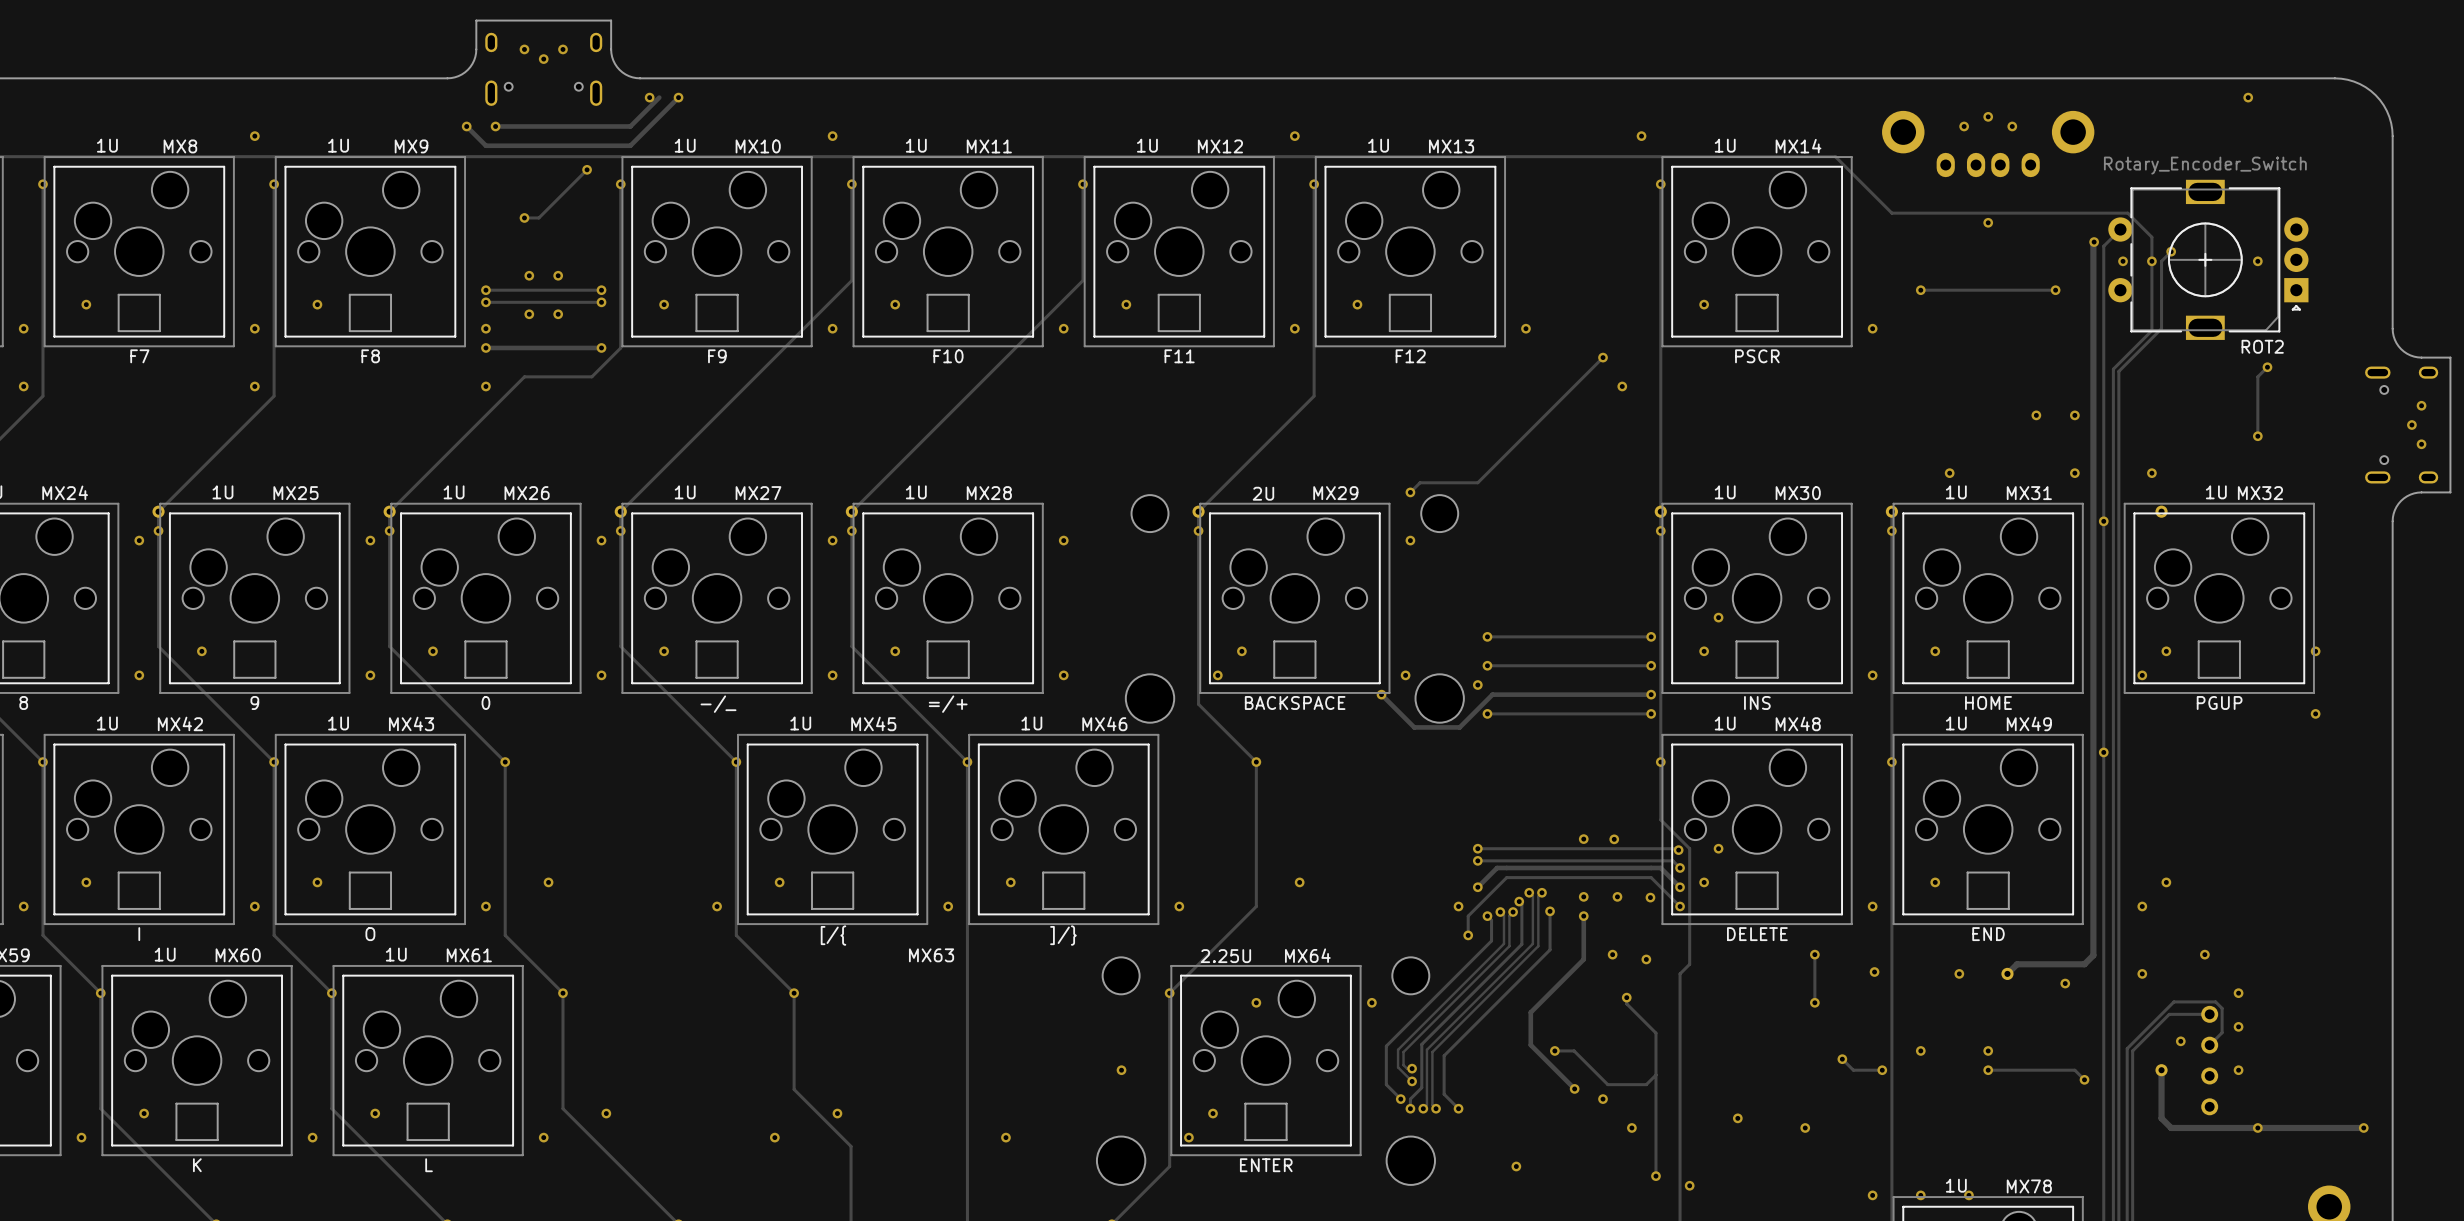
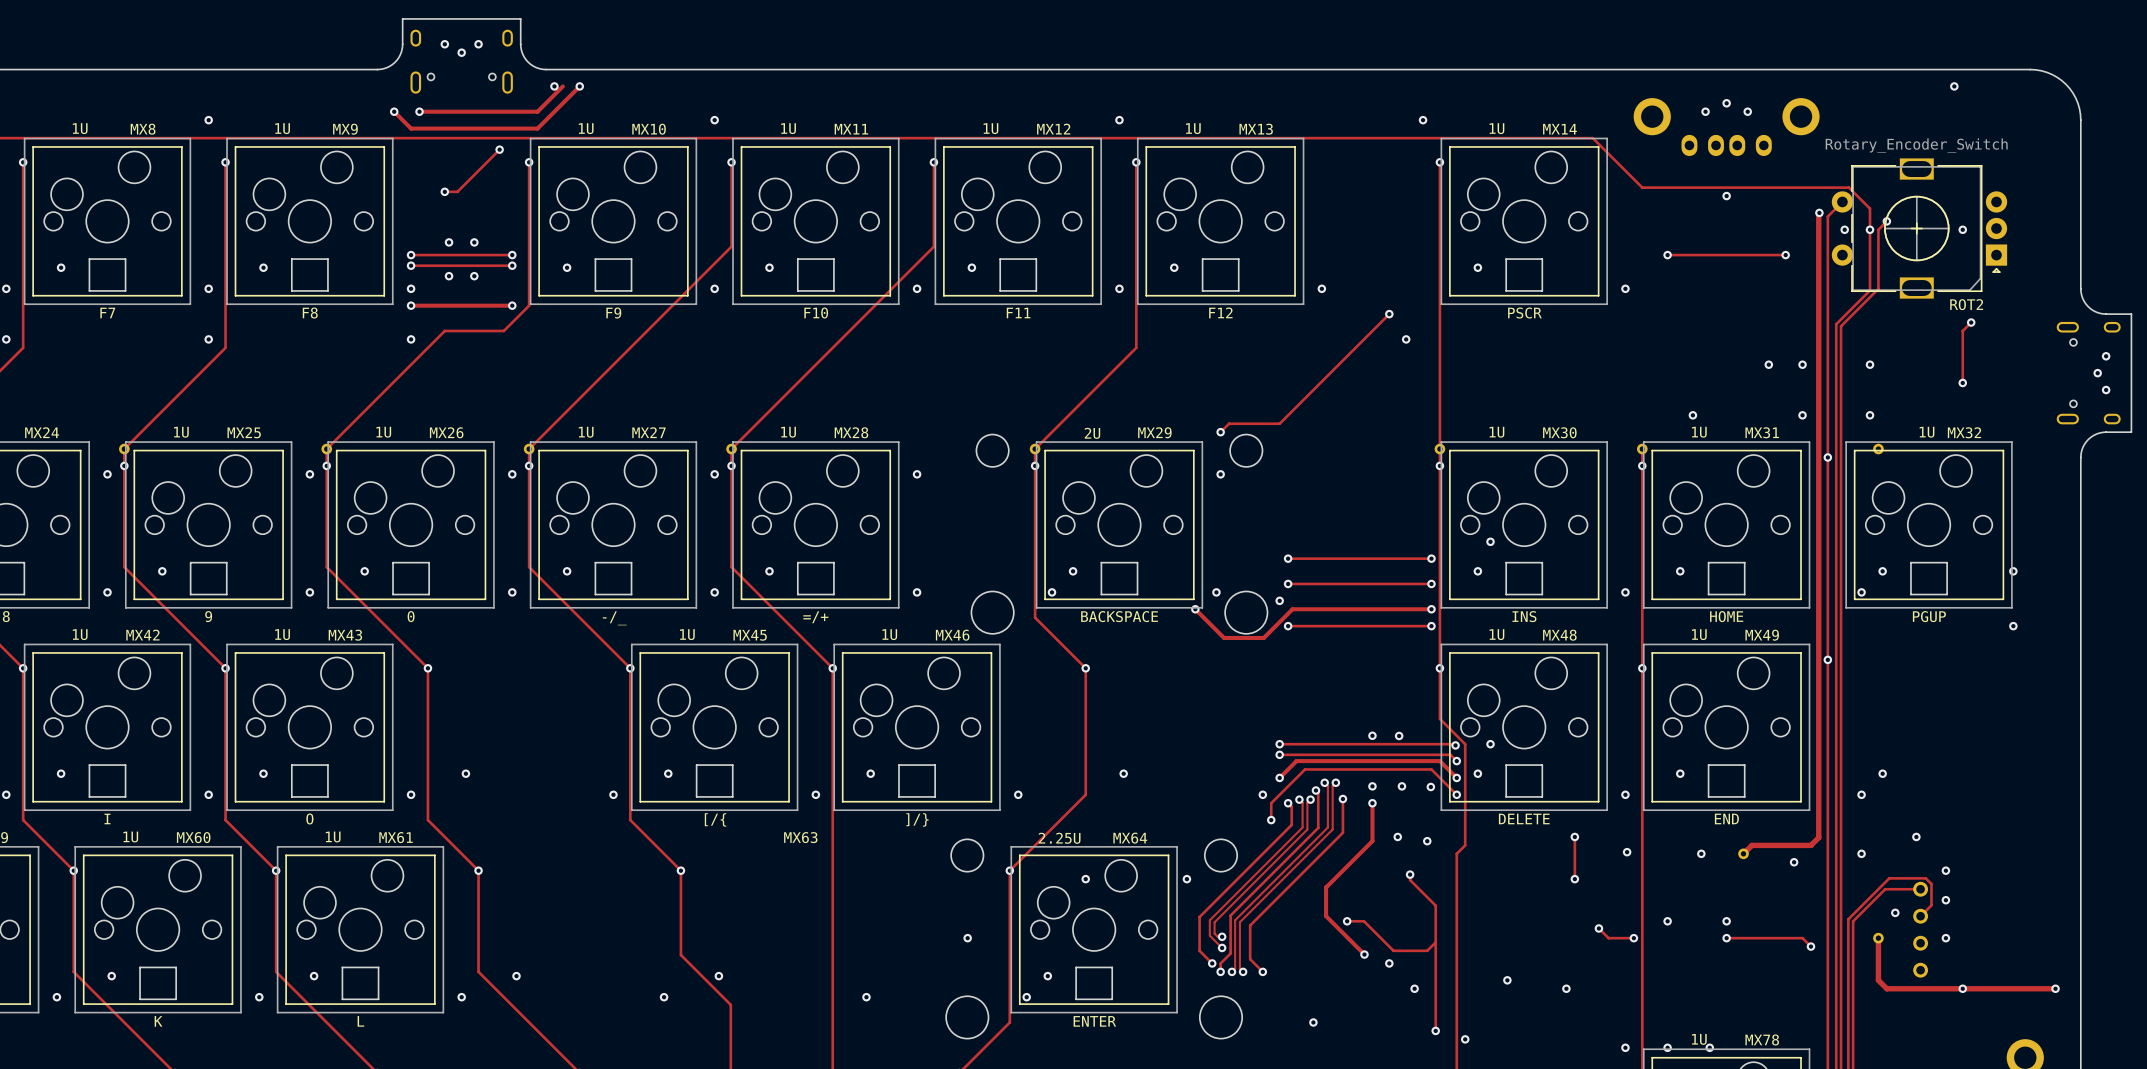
via: none -> (1870, 364)

